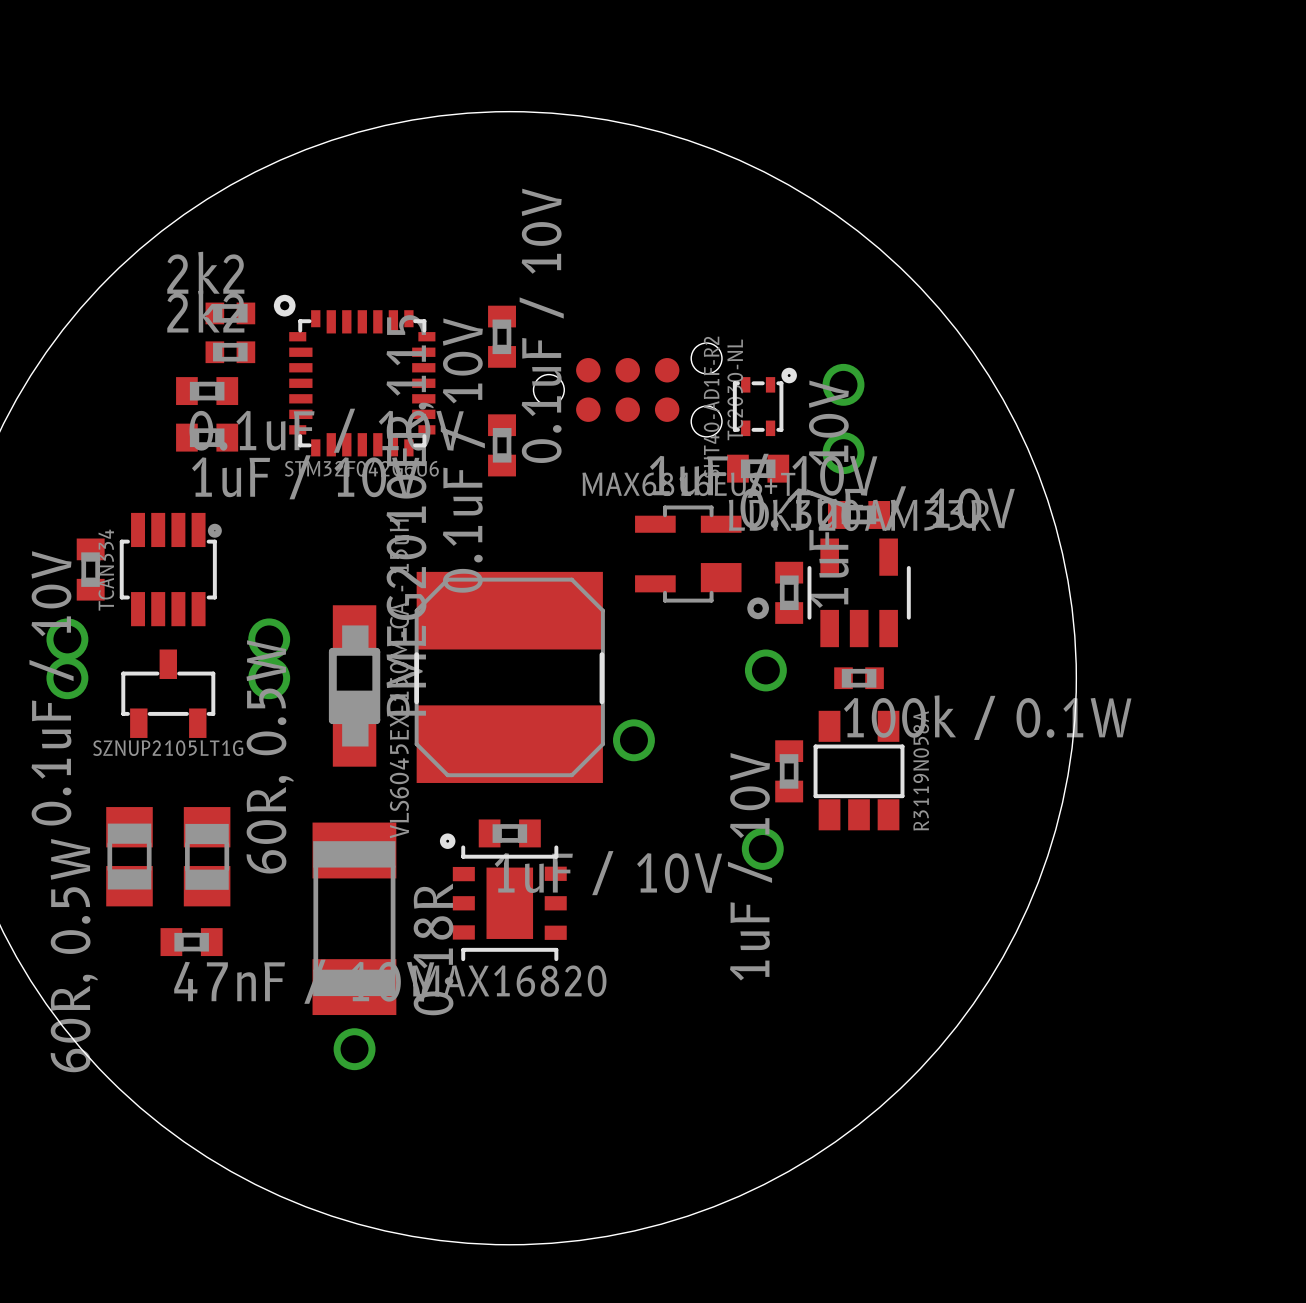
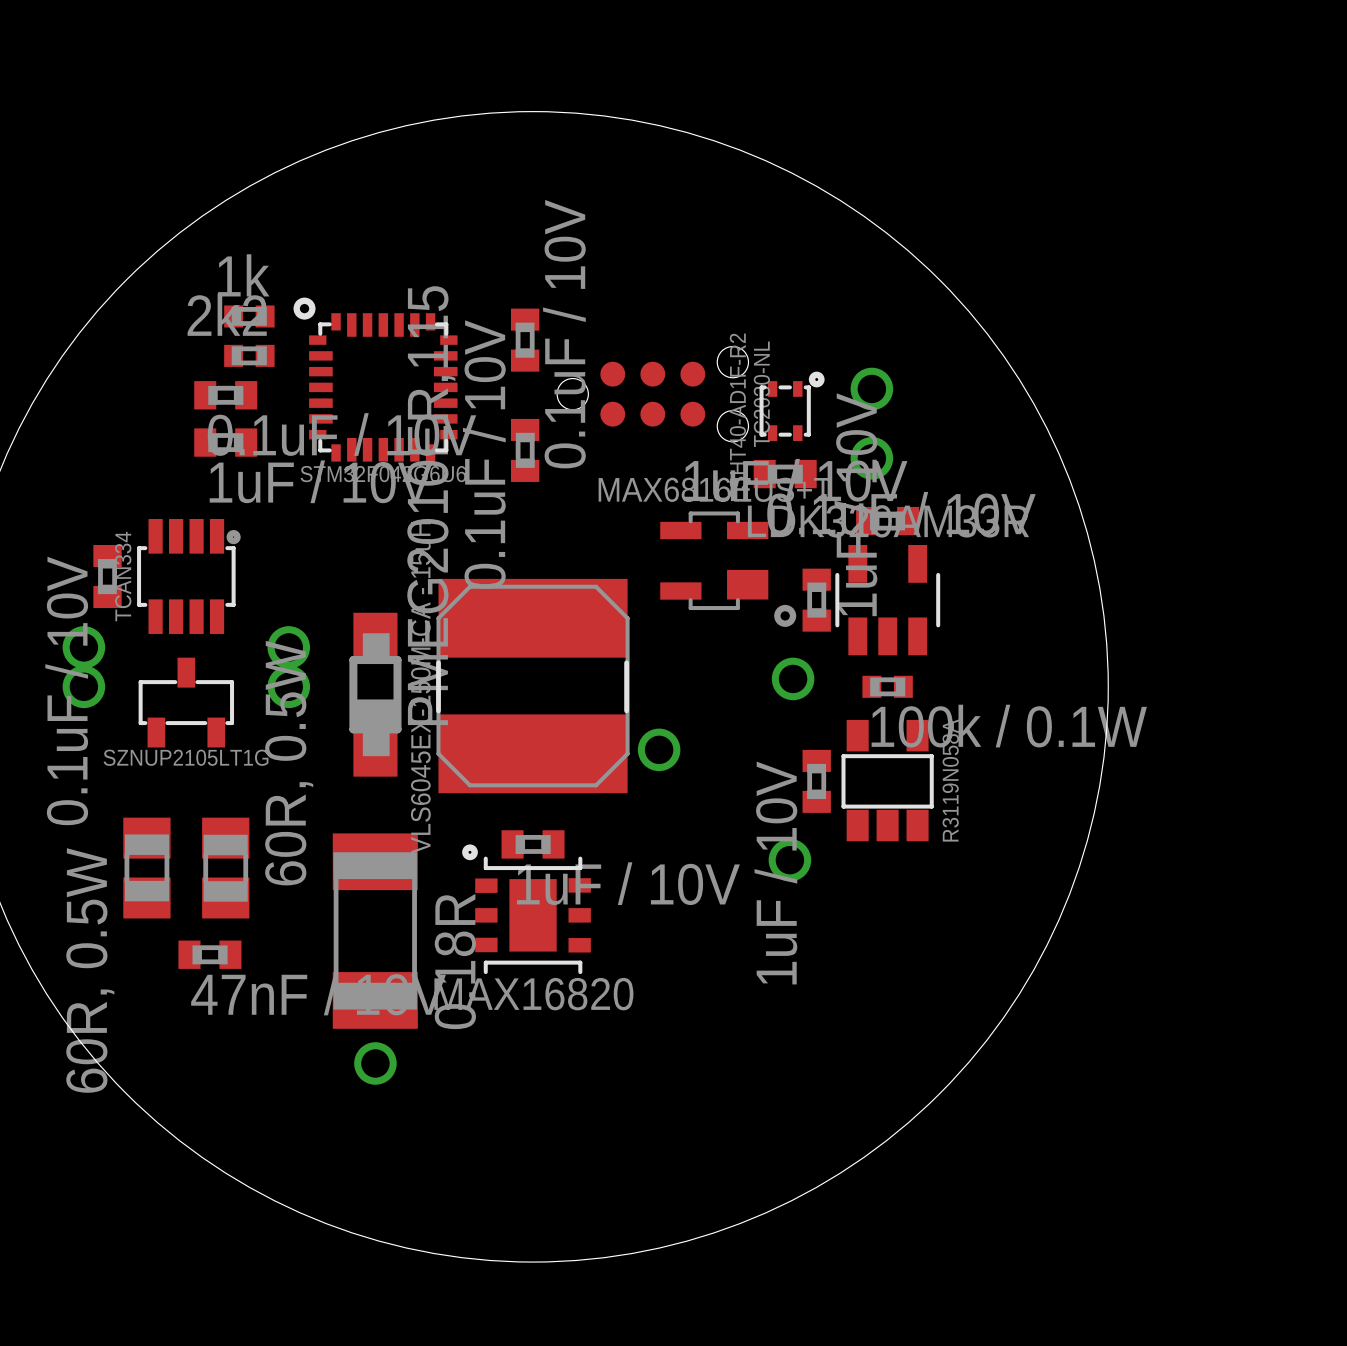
part value: 2k2 (205, 272) -> 1k (243, 275)

